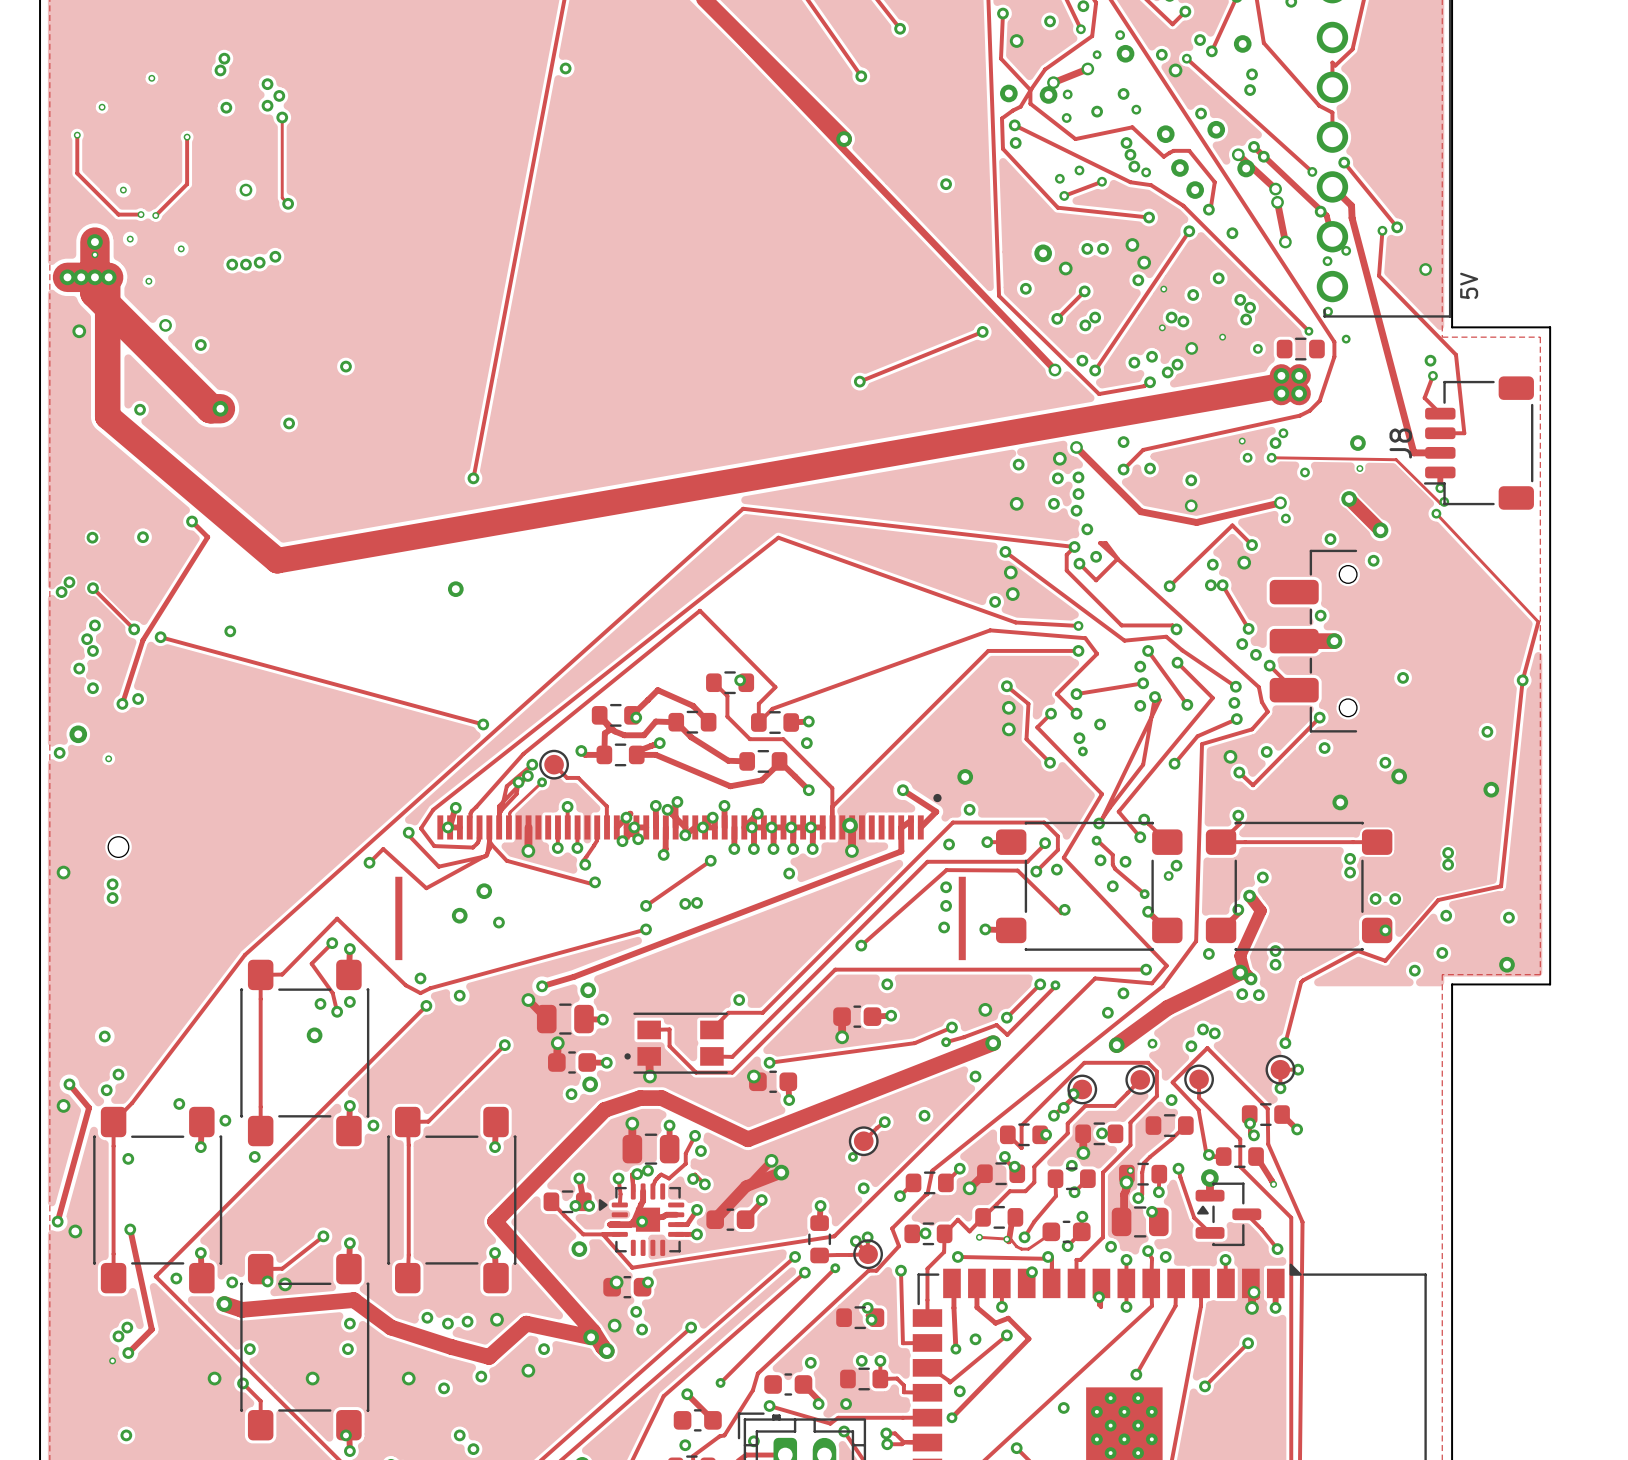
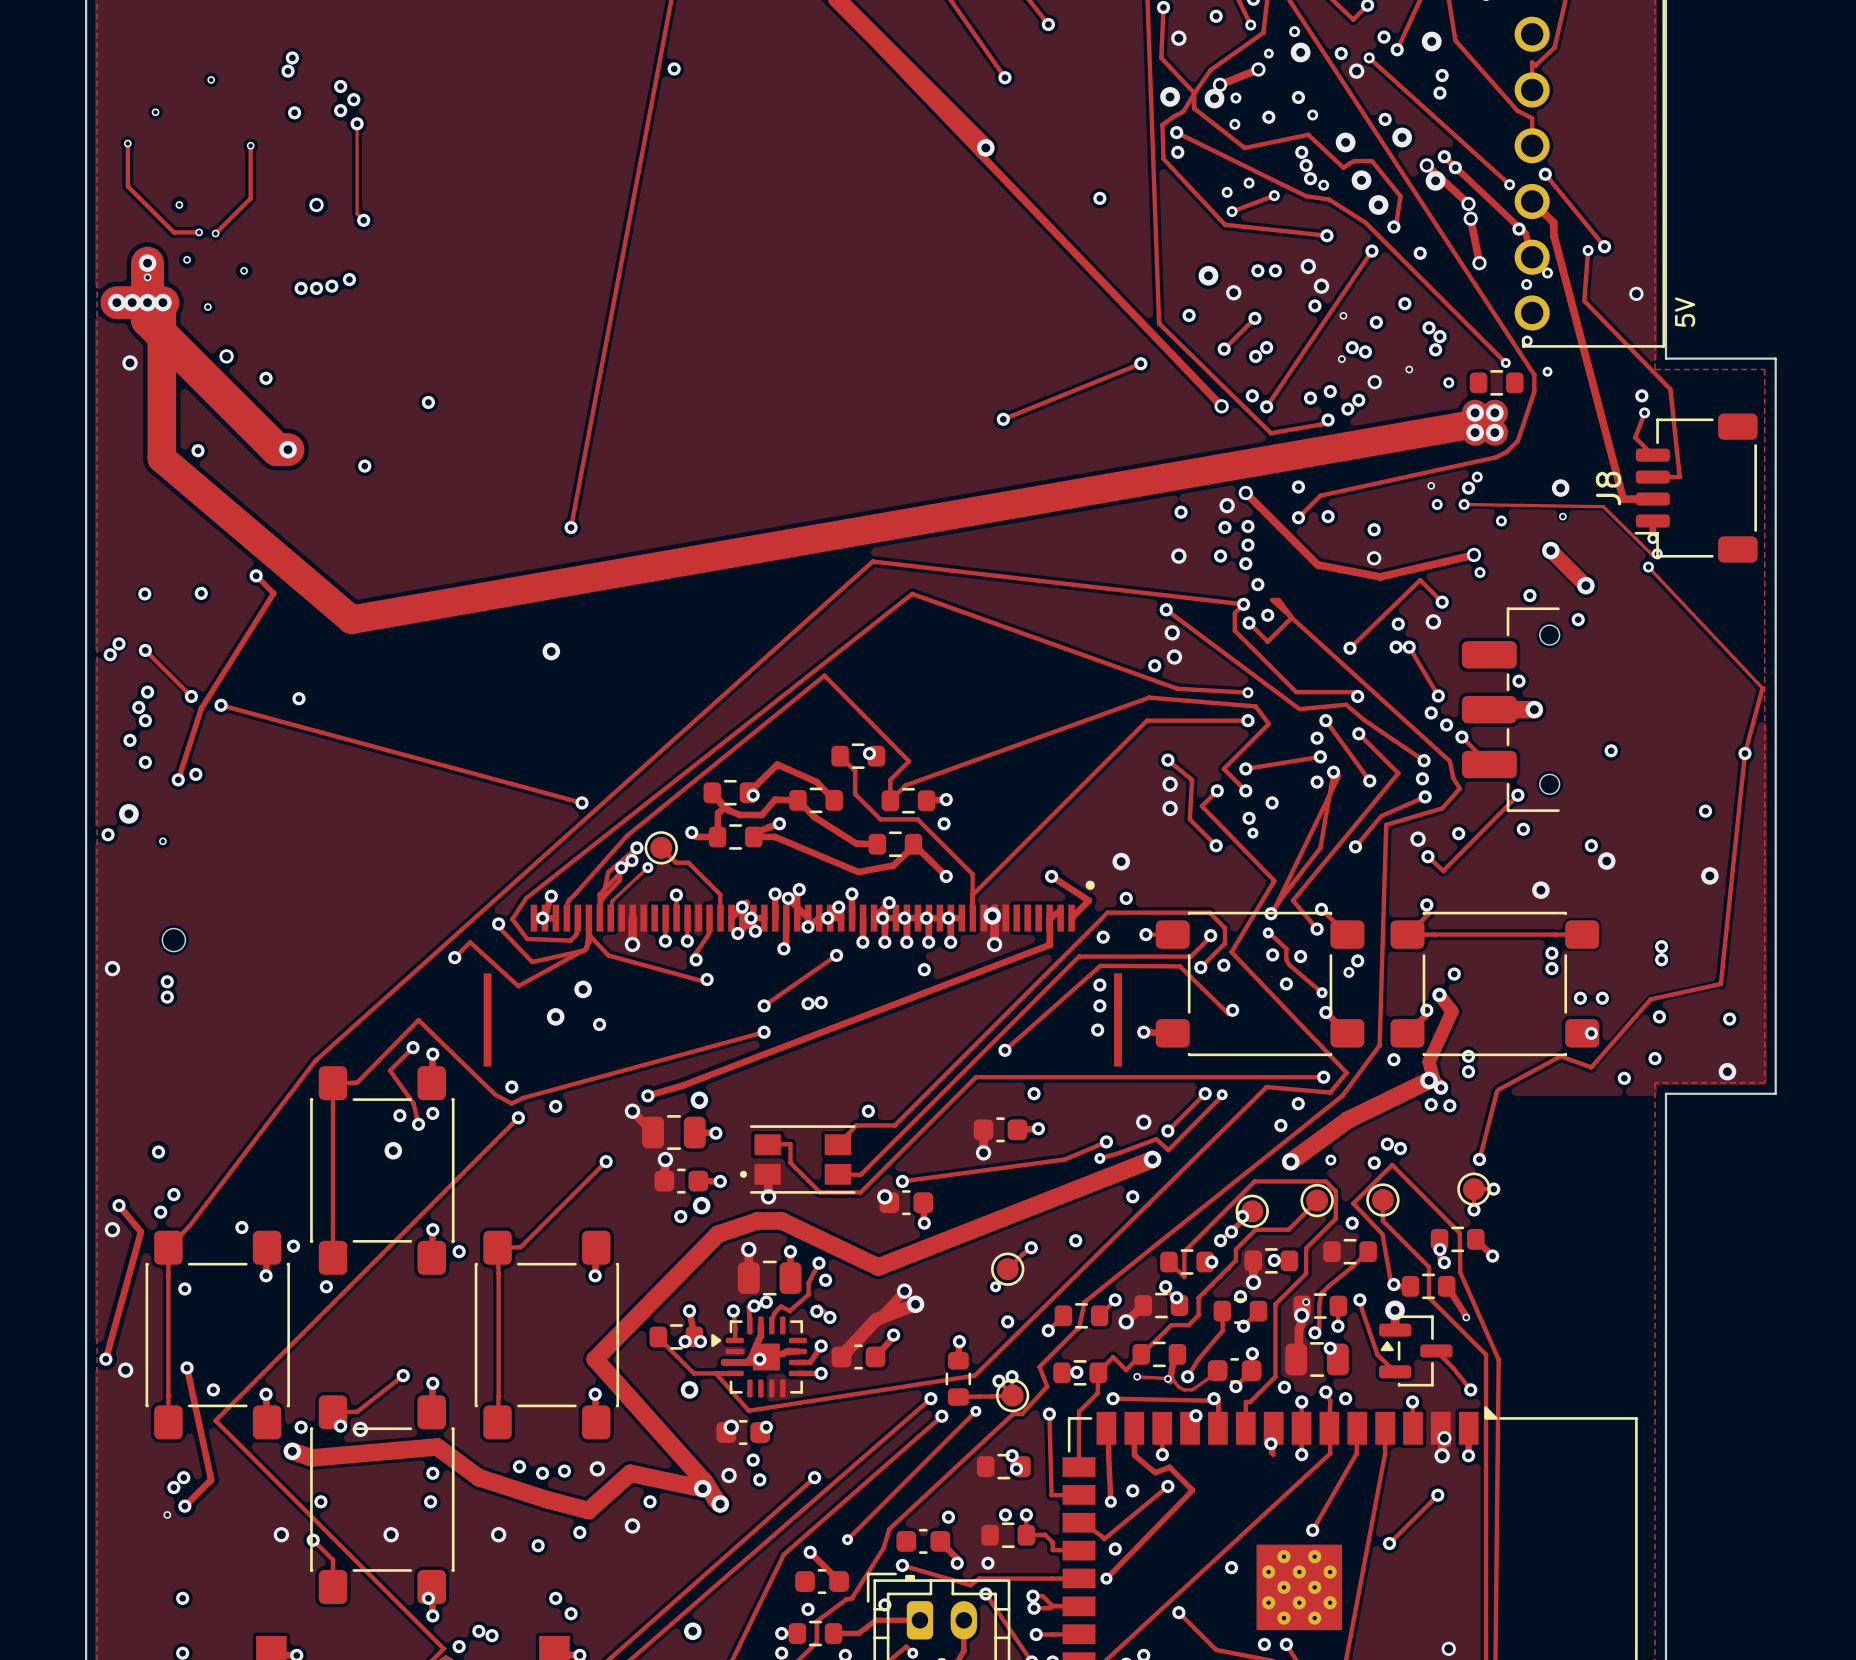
via position: (176, 1278) -> (213, 1389)

